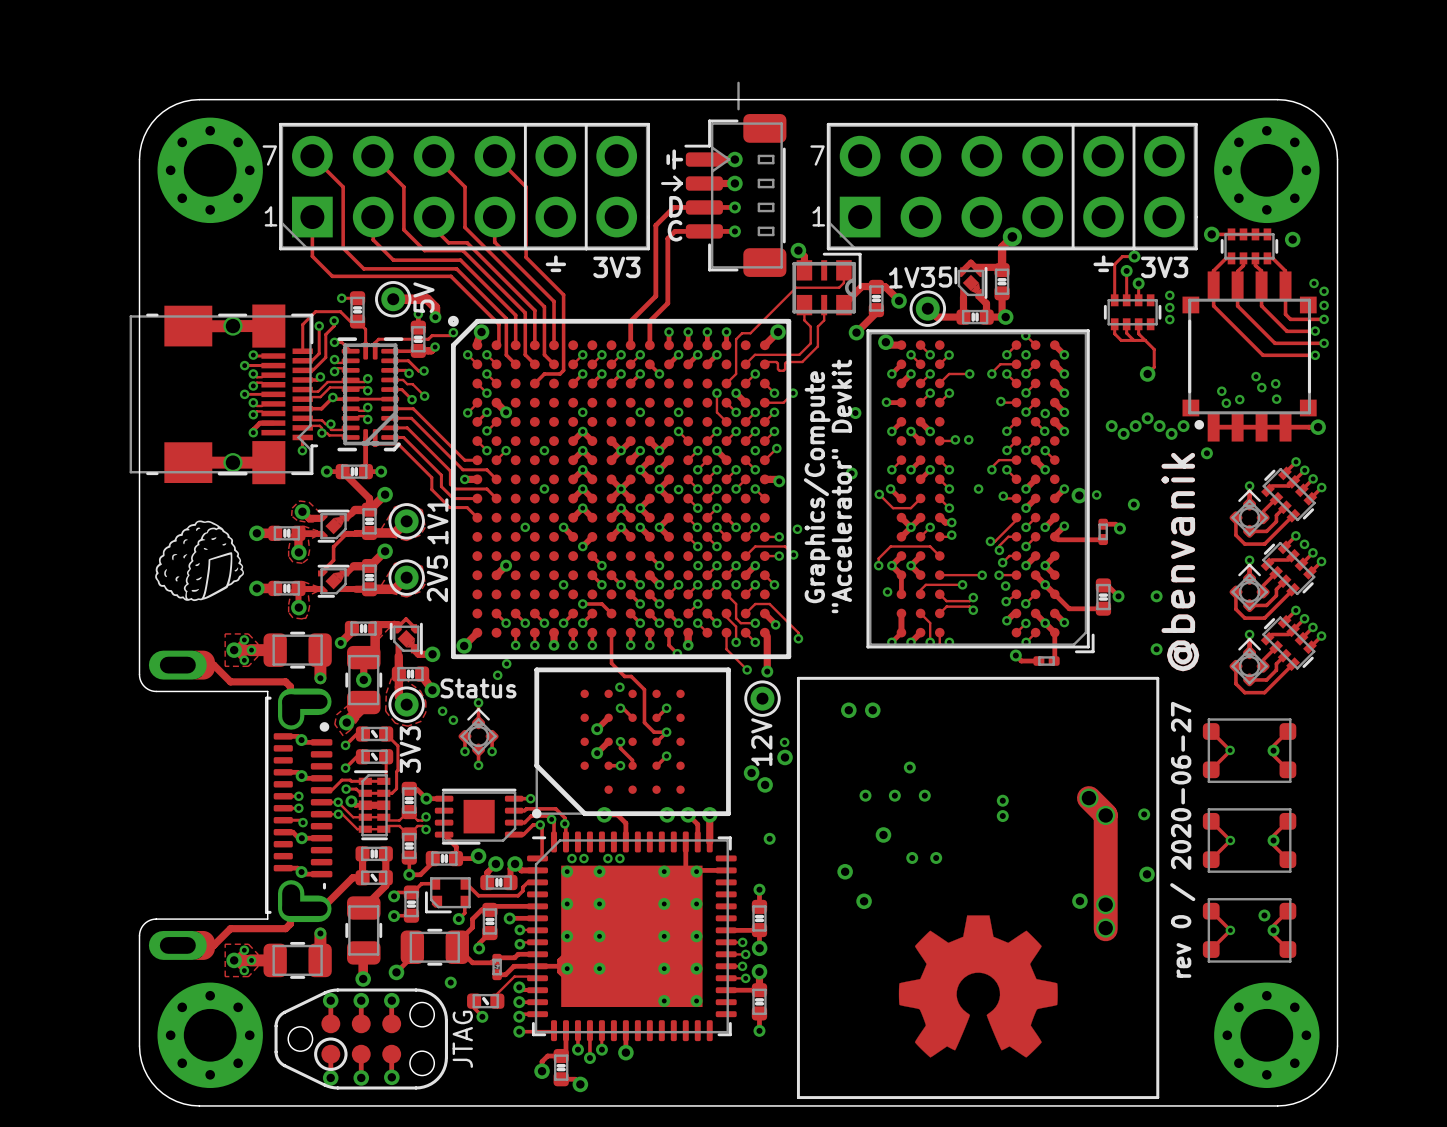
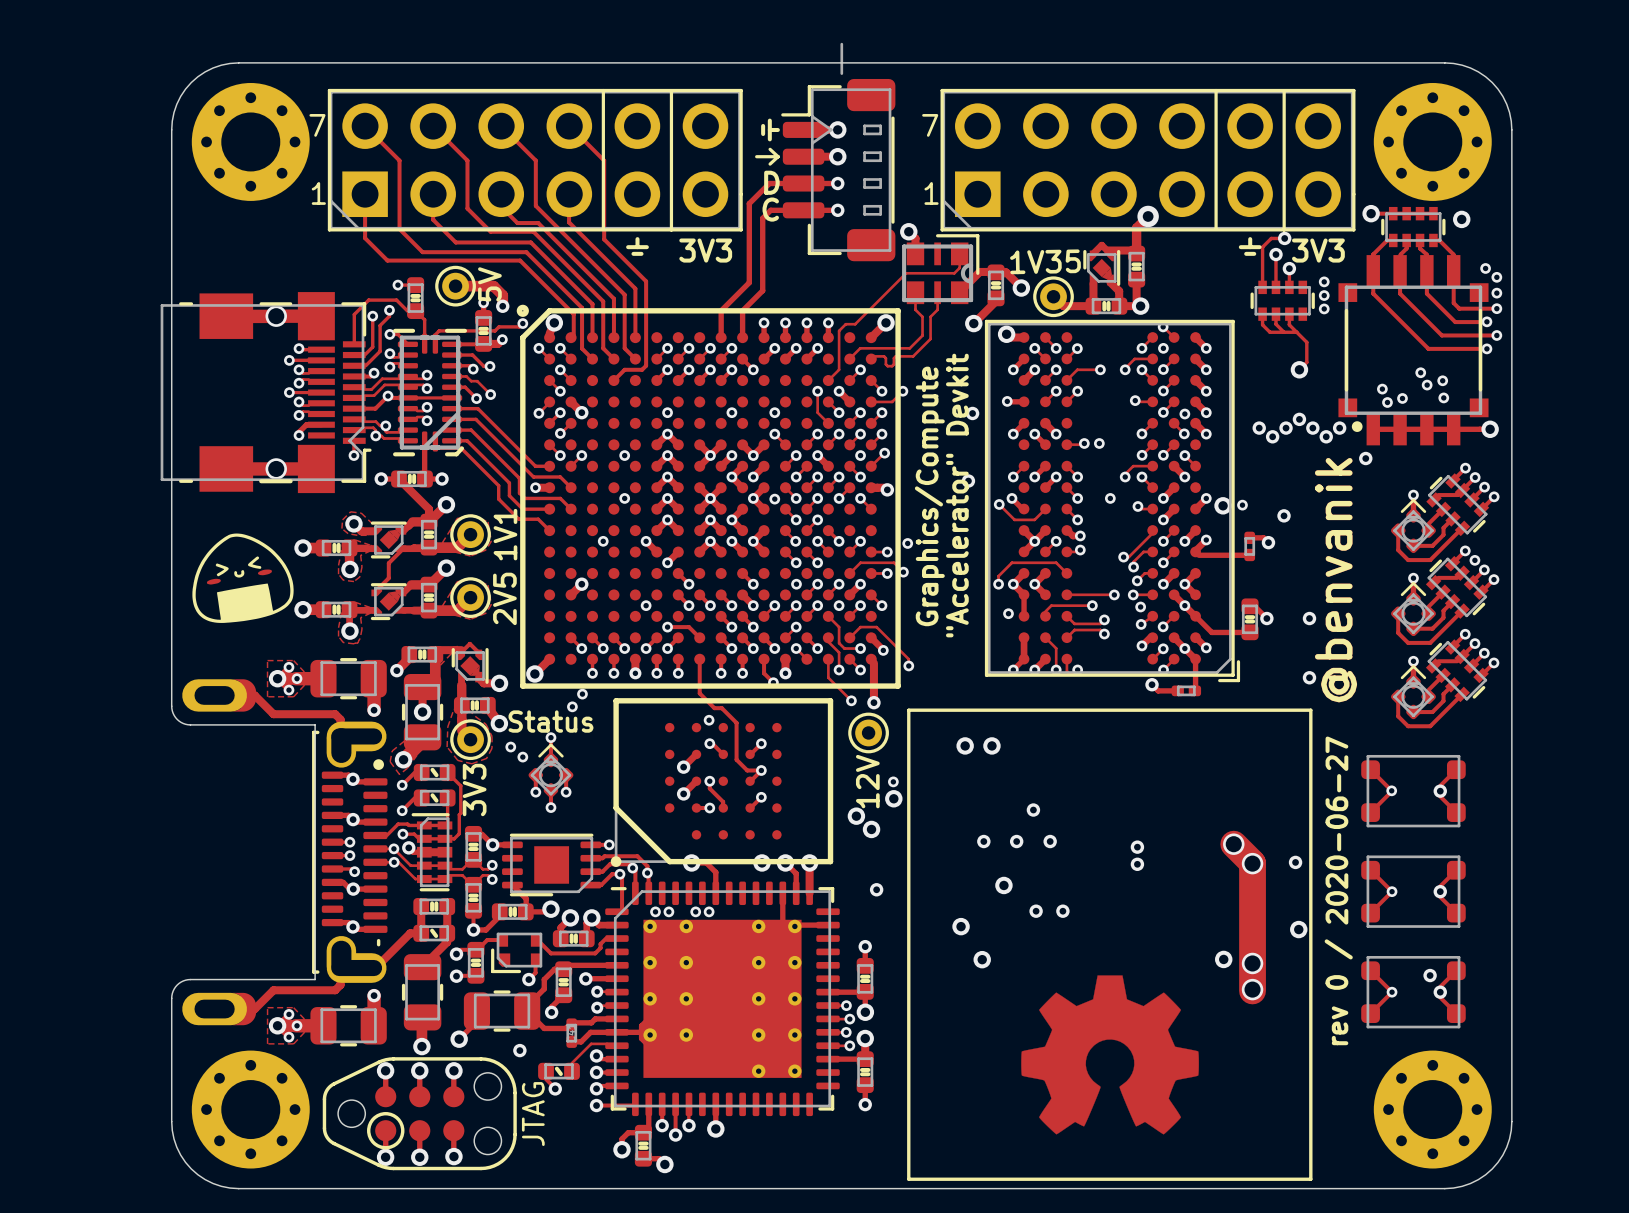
drawing shape: [155, 520, 244, 602] -> [192, 533, 294, 623]

